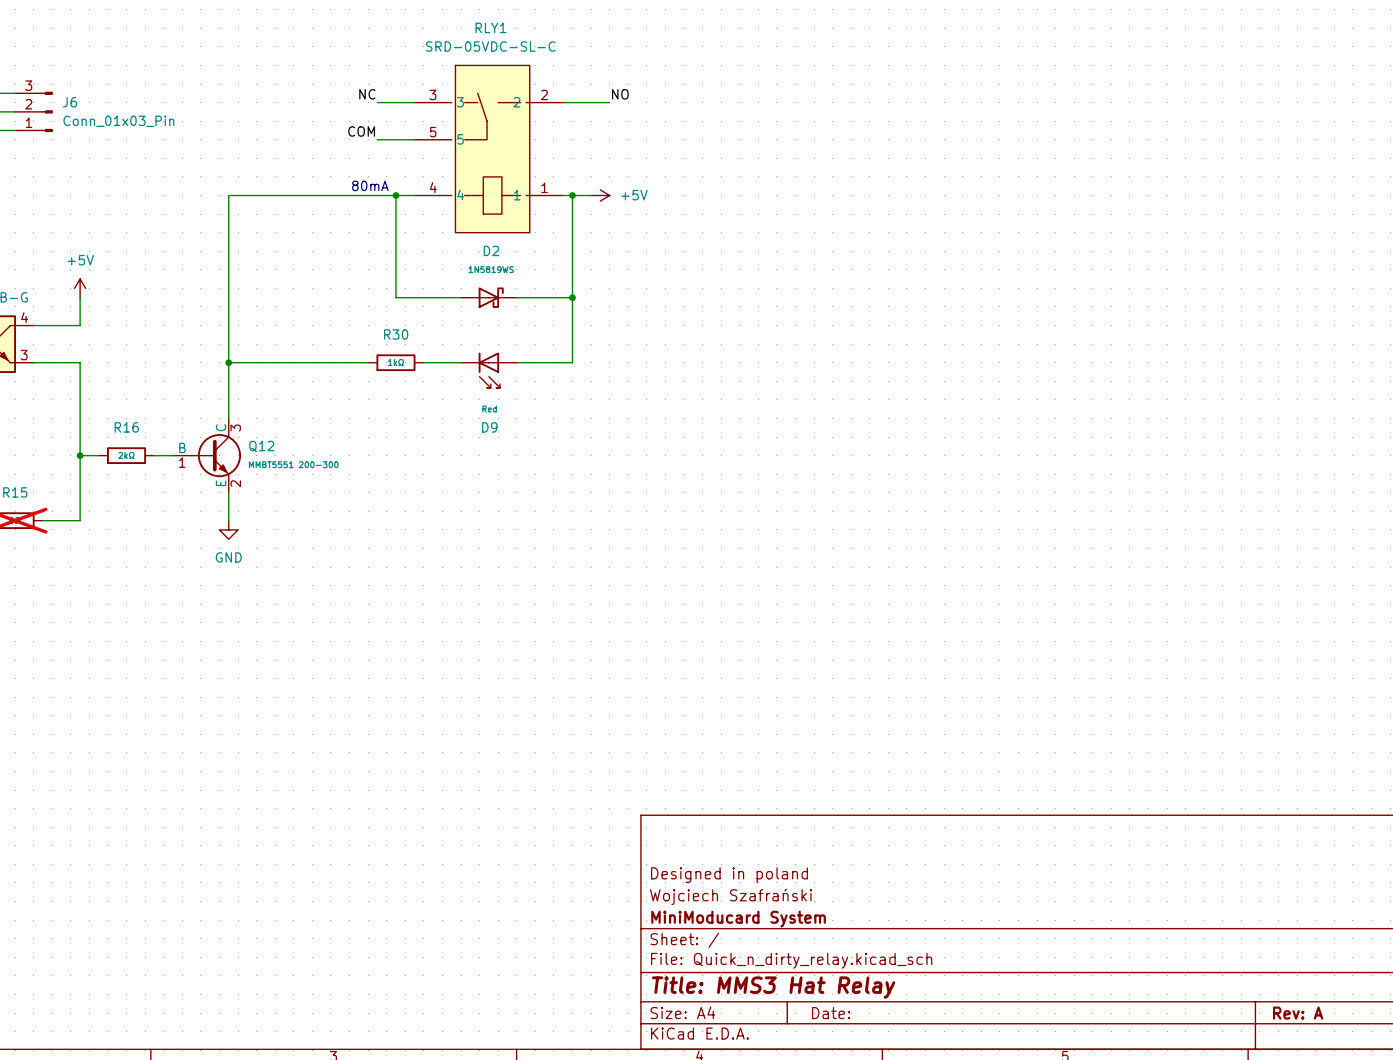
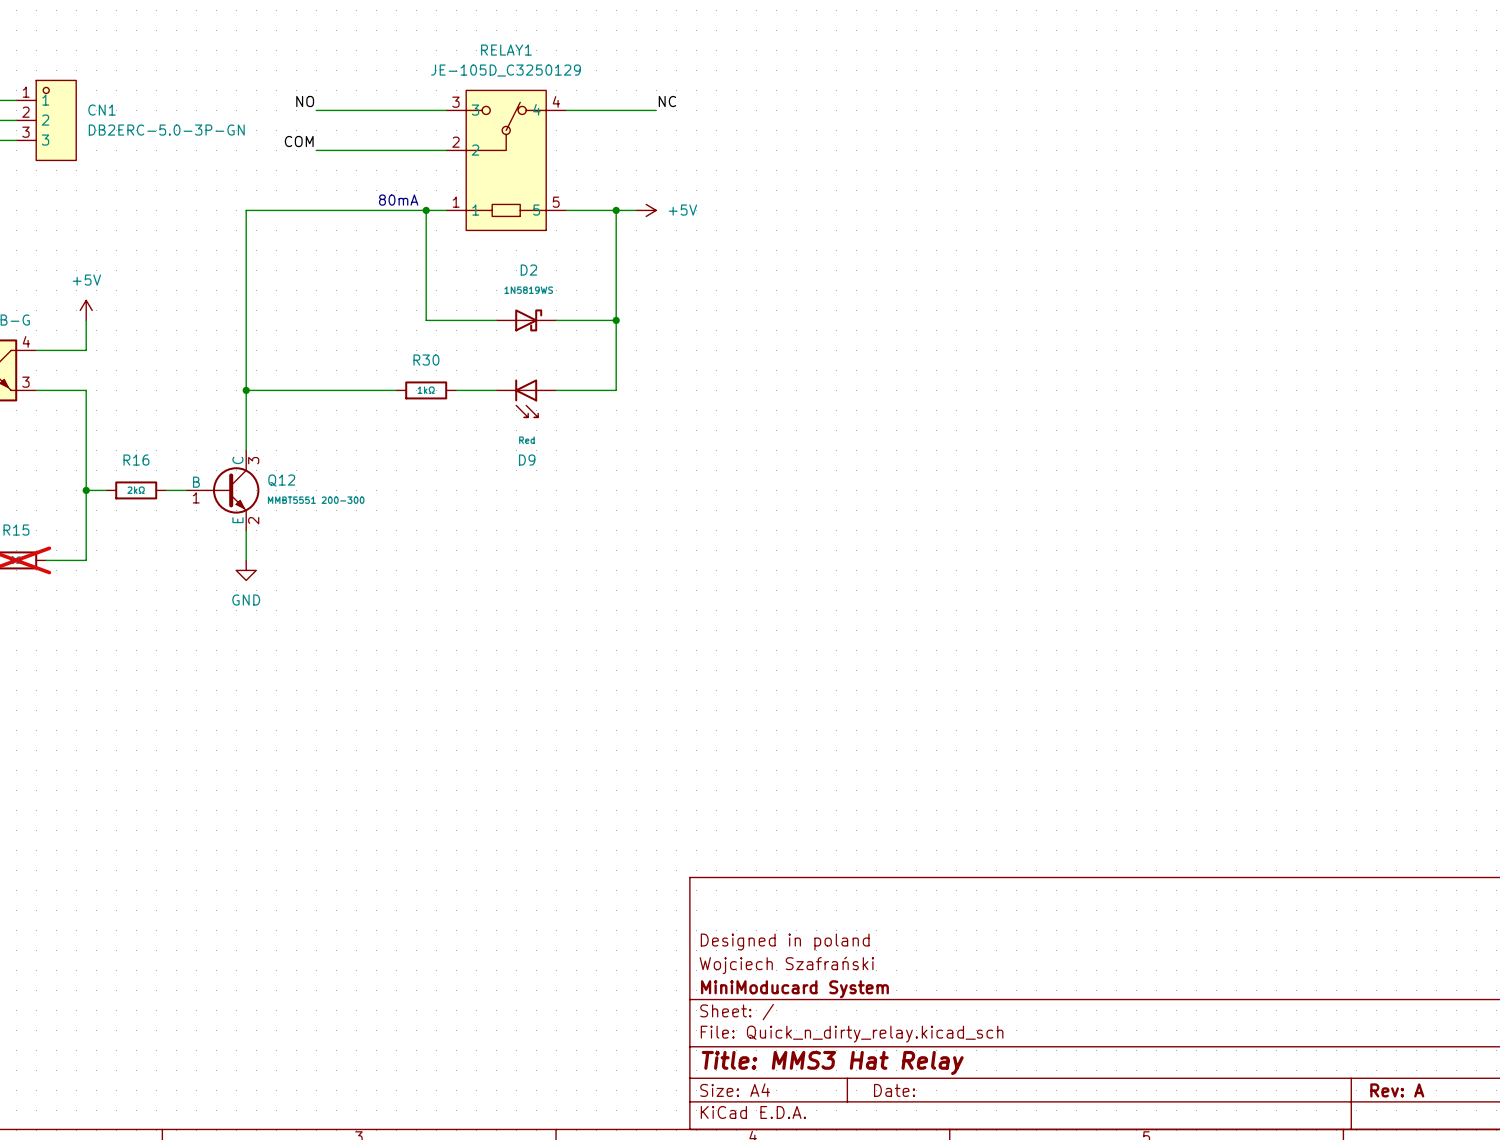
label: none -> NO (305, 101)
label: NC (367, 94) -> none
label: NO (620, 94) -> NC (667, 101)
wire: none -> (316, 110) (406, 110)
J6: Conn_01x03_Pin (33, 111) -> none
CN1: none -> DB2ERC-5.0-3P-GN (46, 120)
label position: COM (361, 131) -> COM (299, 141)
wire: none -> (316, 150) (406, 150)
RELAY1: none -> JE-105D_C3250129 (506, 160)
RLY1: SRD-05VDC-SL-C (488, 149) -> none

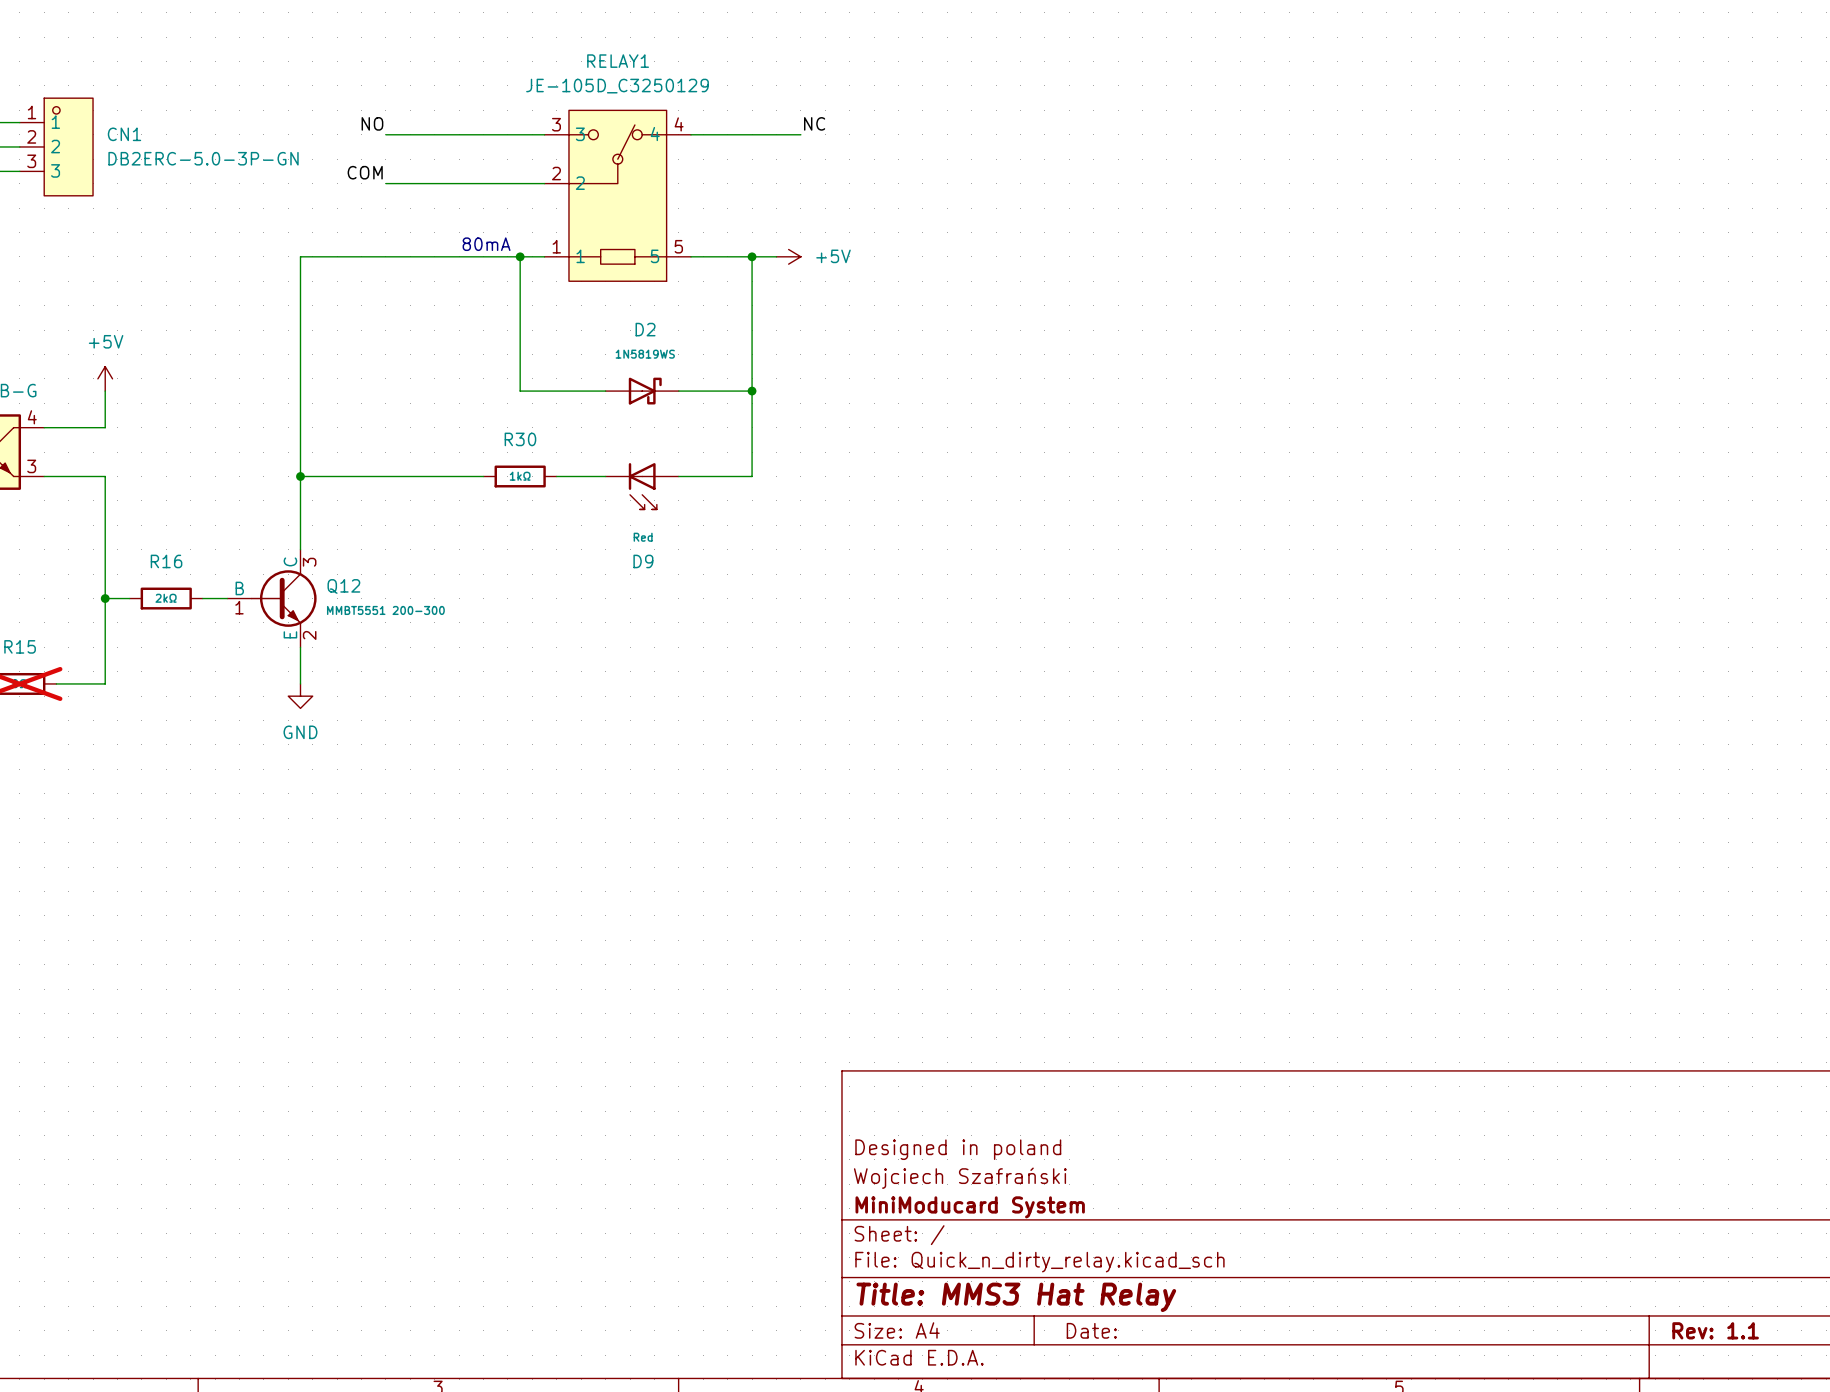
title block: Rev: A (1397, 1090) -> Rev: 1.1 (1715, 1330)

